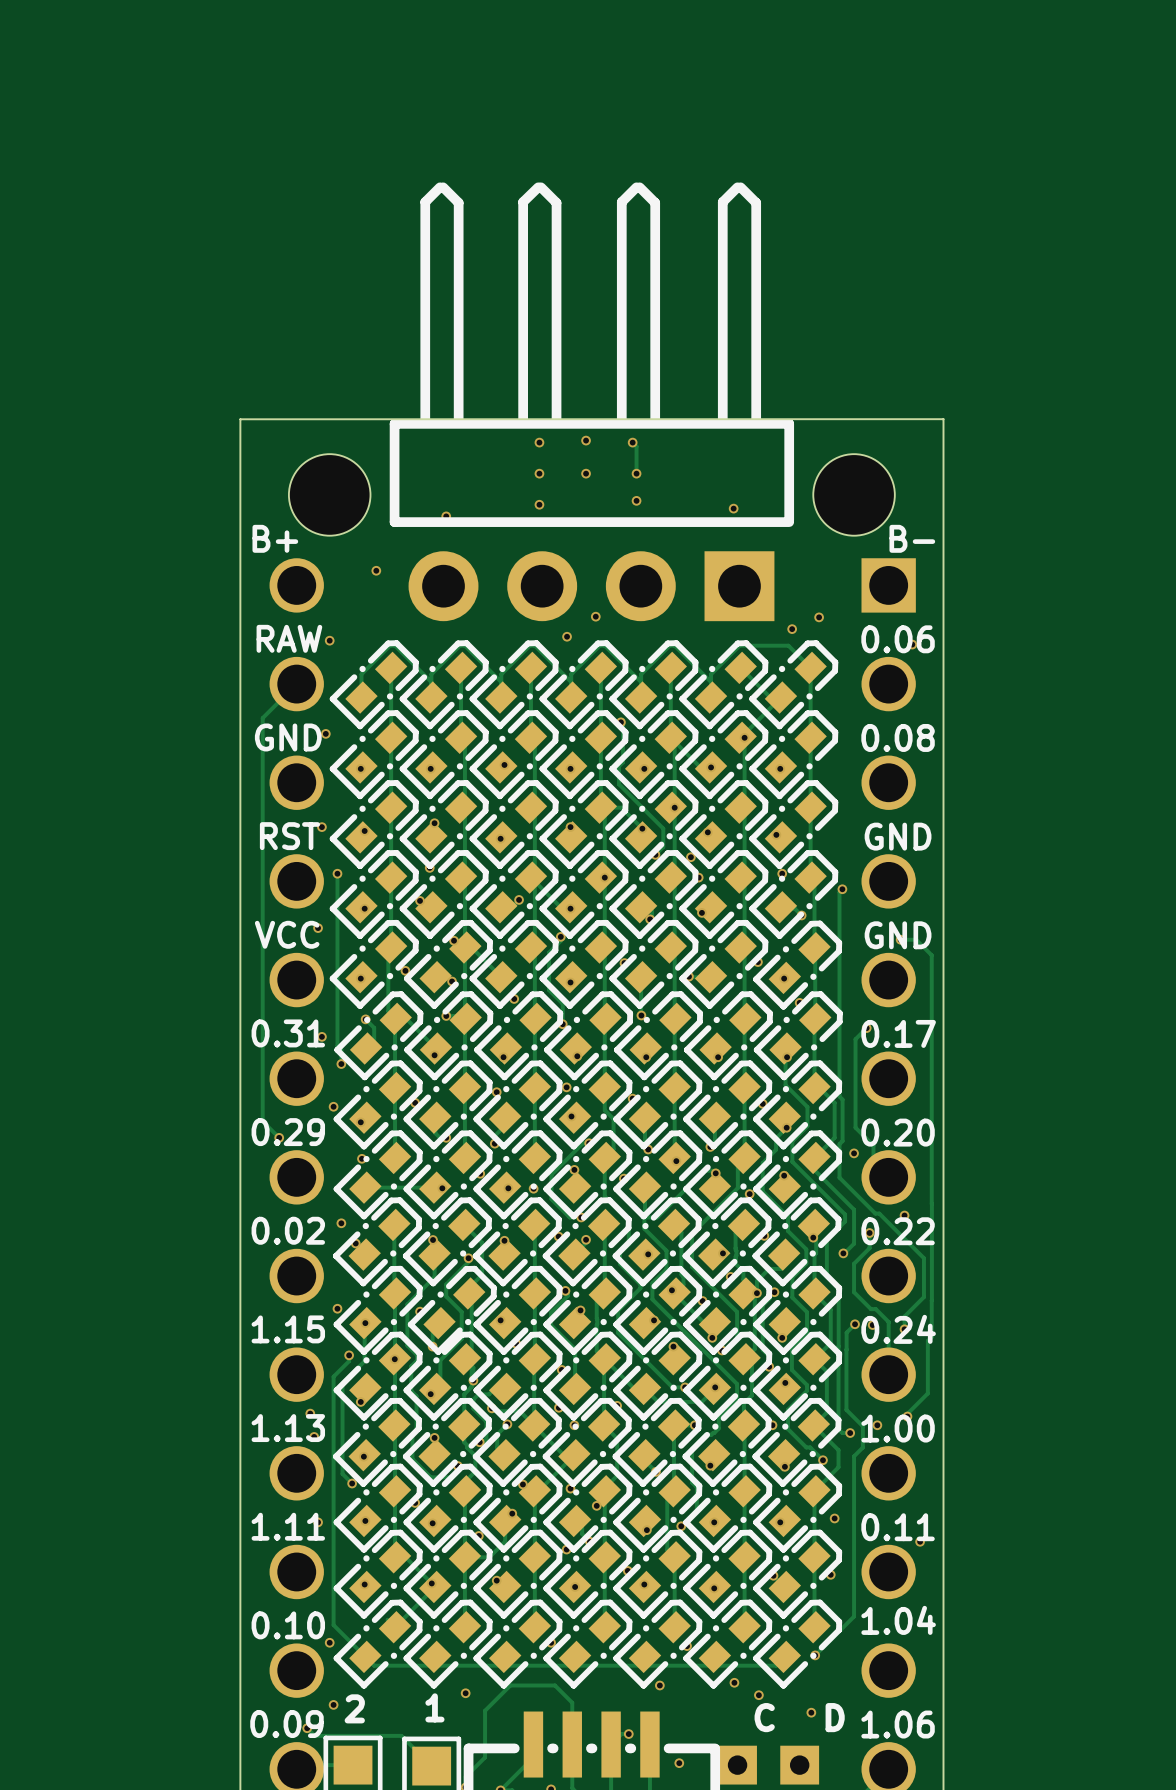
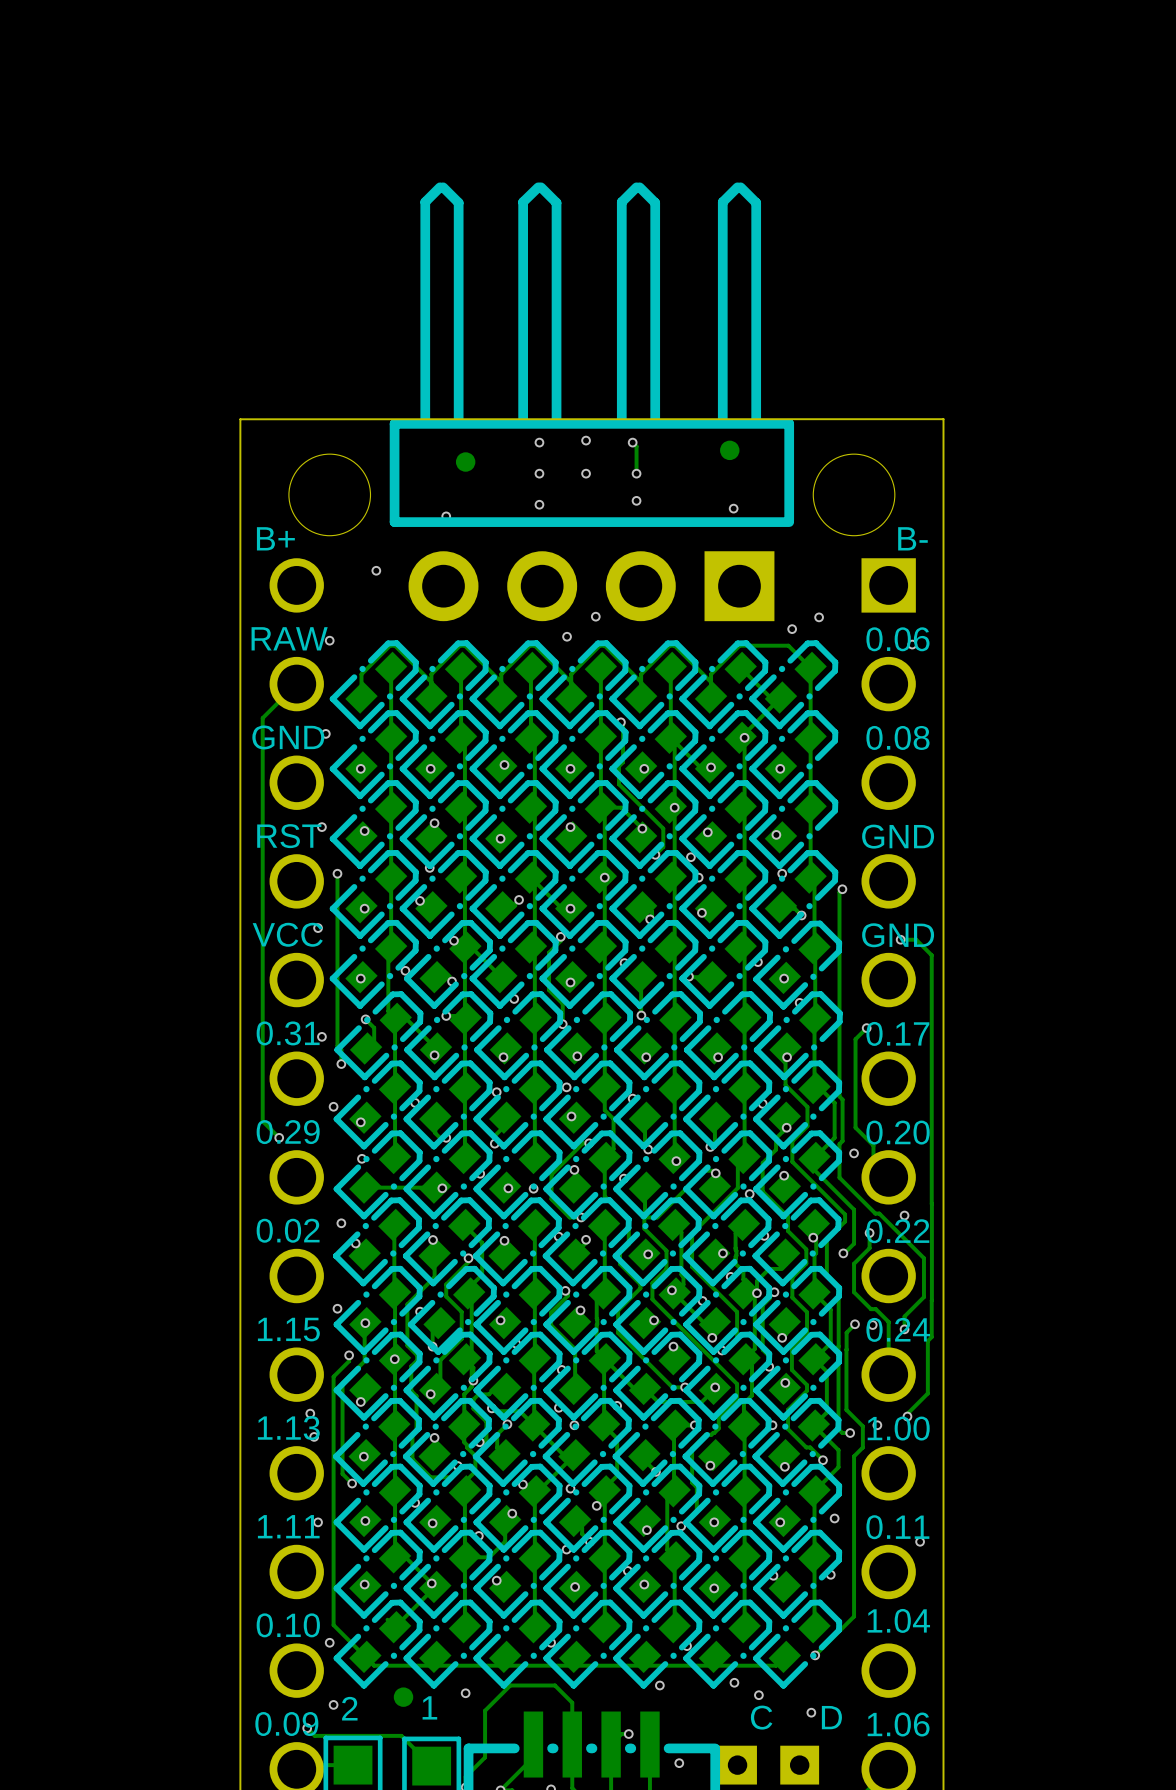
part: none -> (729, 450)
part: none -> (465, 462)
part: none -> (403, 1697)

